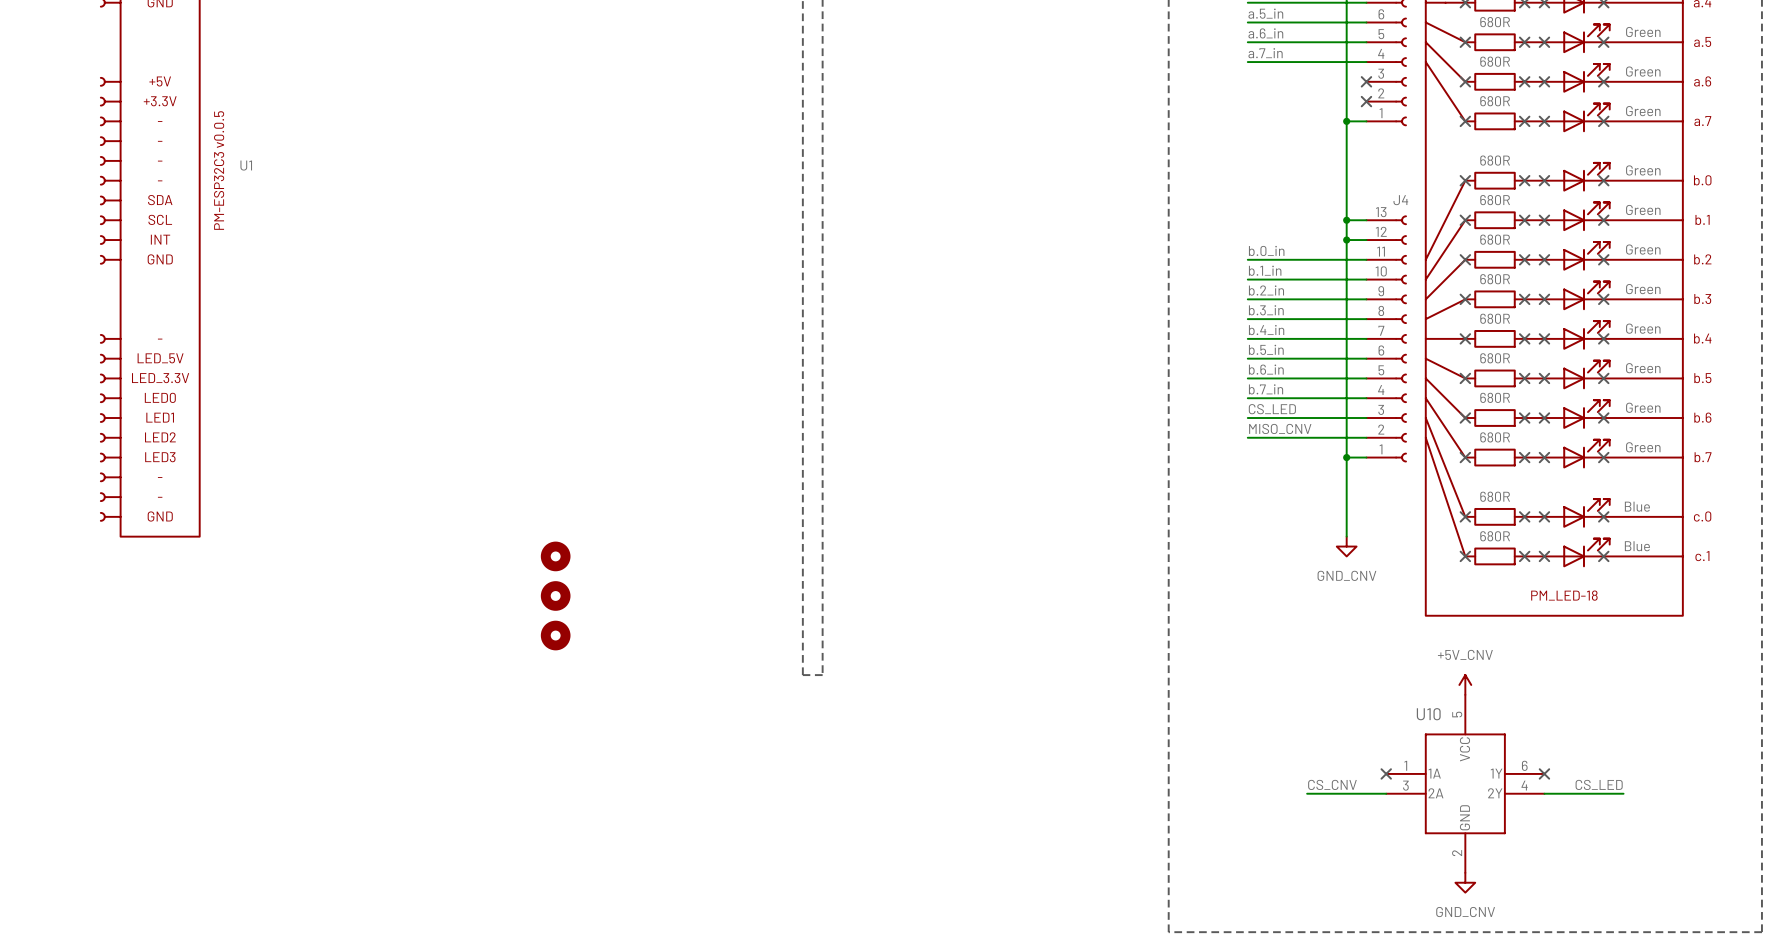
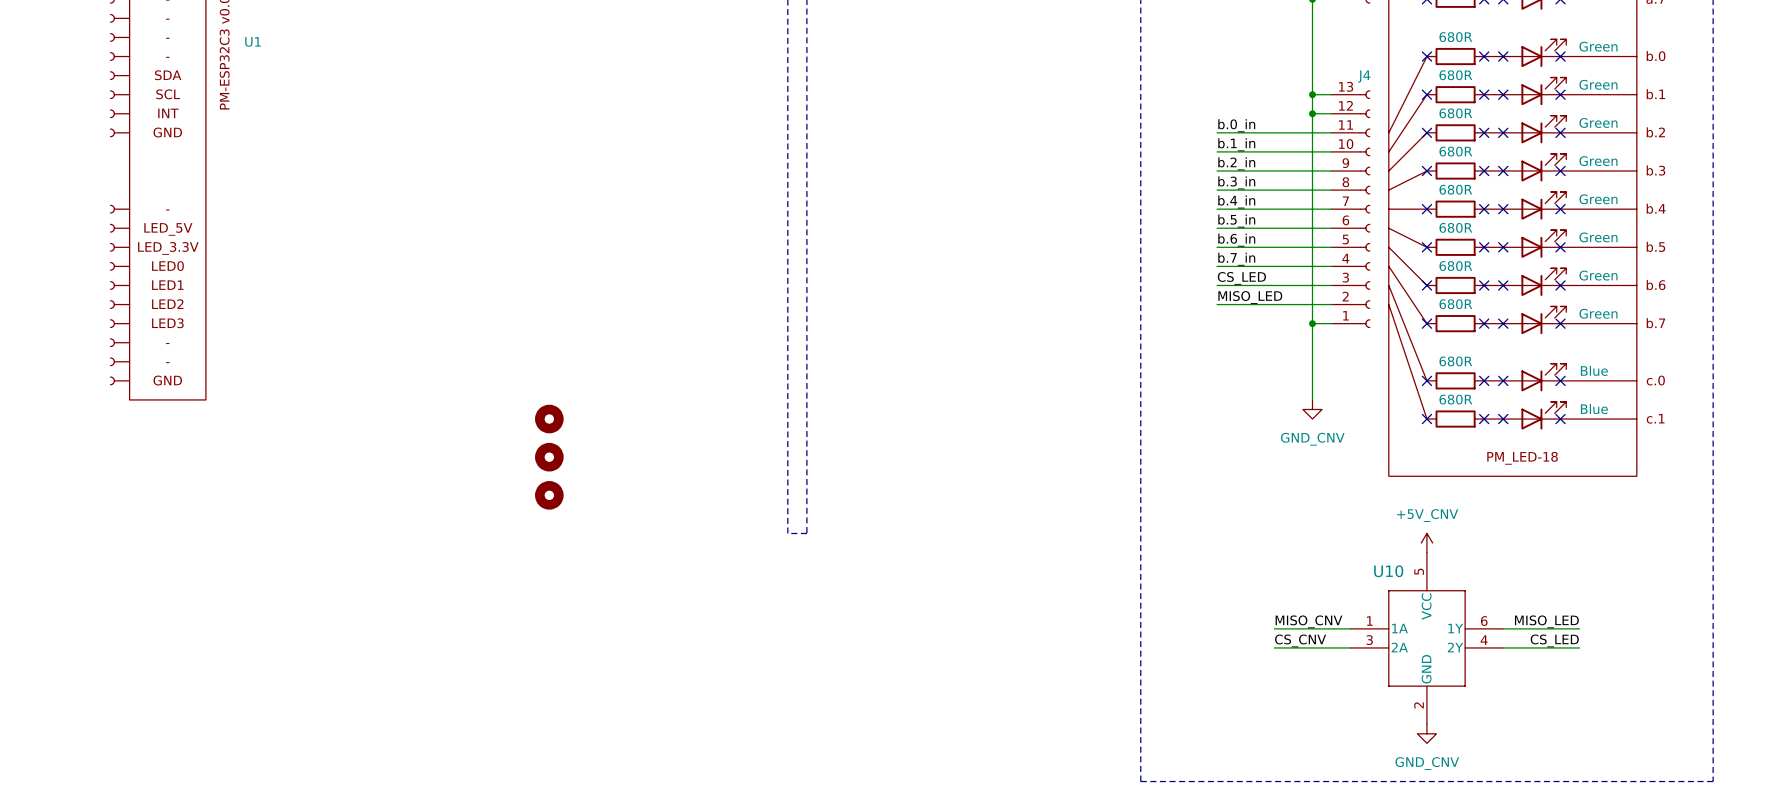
label: MISO_CNV (1280, 428) -> MISO_LED (1250, 297)
label: none -> MISO_CNV (1309, 621)
label: none -> MISO_LED (1546, 621)
wire: none -> (1274, 628) (1350, 628)
no-connect mark: (1386, 773) -> none
wire: none -> (1503, 628) (1579, 628)
no-connect mark: (1544, 773) -> none

